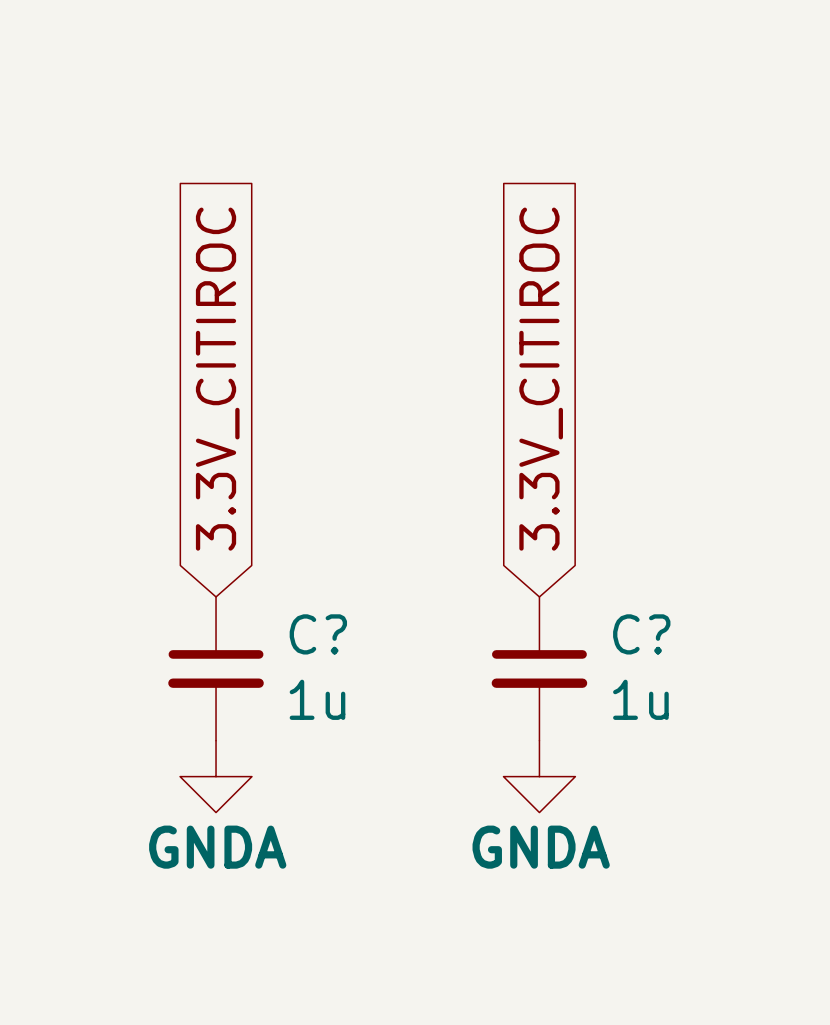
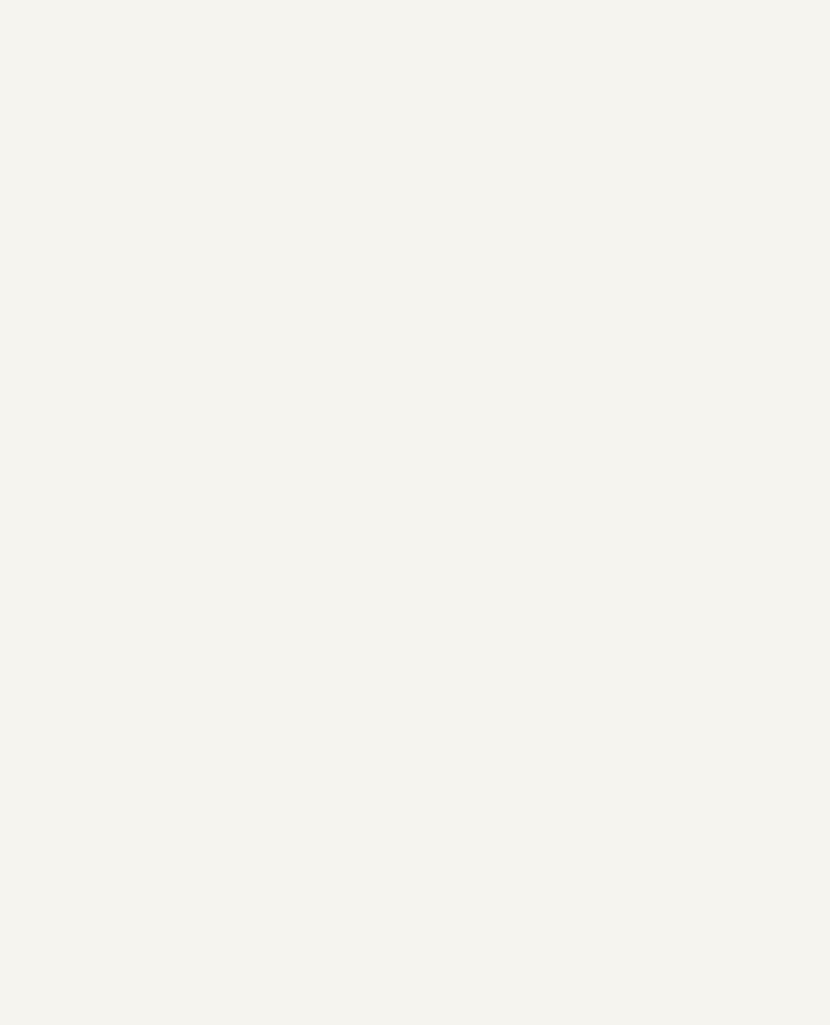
global label: 3.3V_CITIROC (217, 379) -> none
global label: 3.3V_CITIROC (541, 379) -> none
C?: 1u (216, 668) -> none
C?: 1u (539, 668) -> none
power symbol: GNDA (216, 776) -> none
power symbol: GNDA (539, 776) -> none

